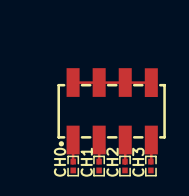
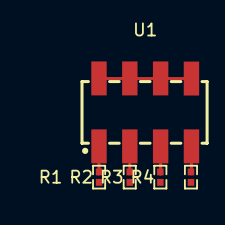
U1 name: none -> U1 (145, 29)
text: CH0 (60, 162) -> none
text: CH1 (86, 162) -> none
text: CH2 (112, 162) -> none
text: CH3 (138, 162) -> none
R1 name: none -> R1 (50, 176)
R2 name: none -> R2 (81, 176)
R3 name: none -> R3 (112, 176)
R4 name: none -> R4 (143, 176)

